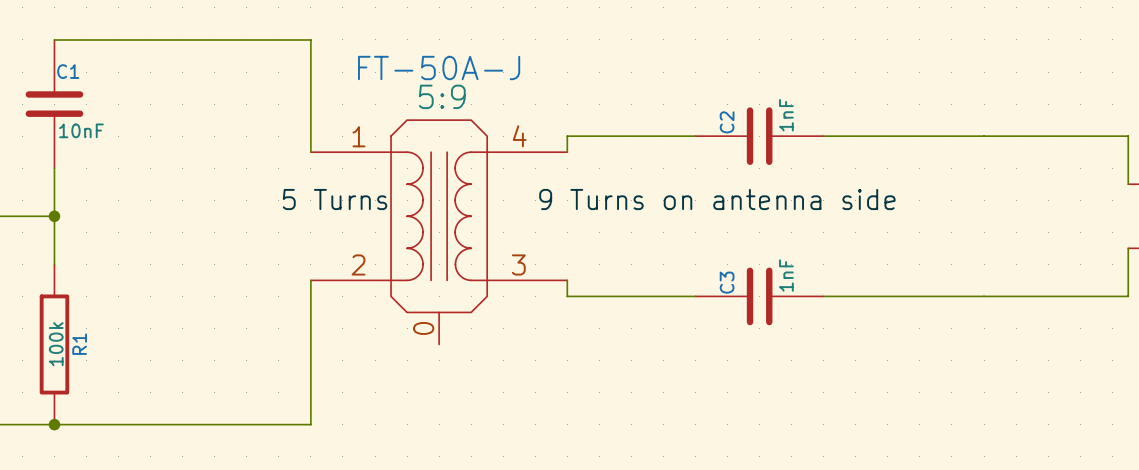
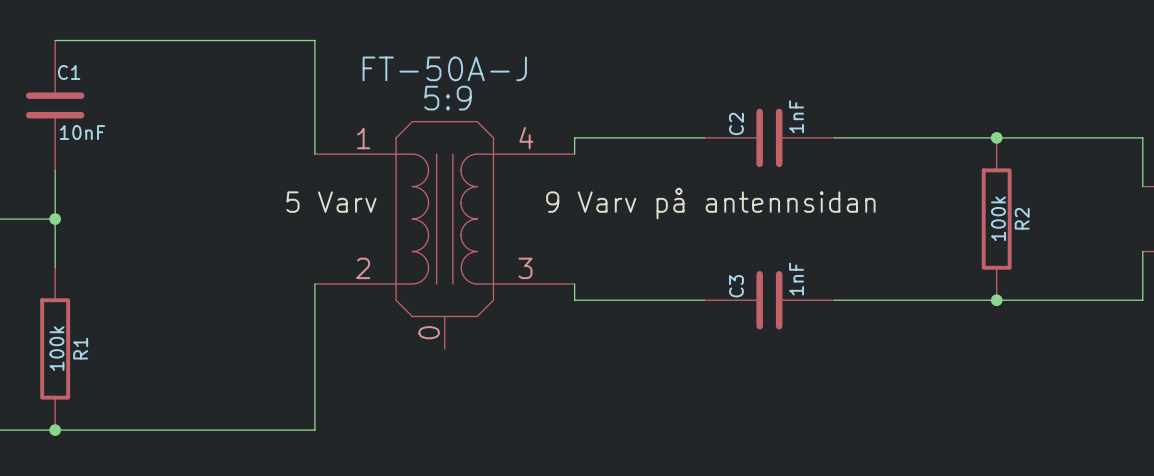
junction: none -> (996, 137)
label: 5 Turns (335, 199) -> 5 Varv (331, 202)
label: 9 Turns on antenna side (717, 199) -> 9 Varv på antennsidan (710, 203)
R2: none -> 100k (996, 219)
junction: none -> (996, 300)

